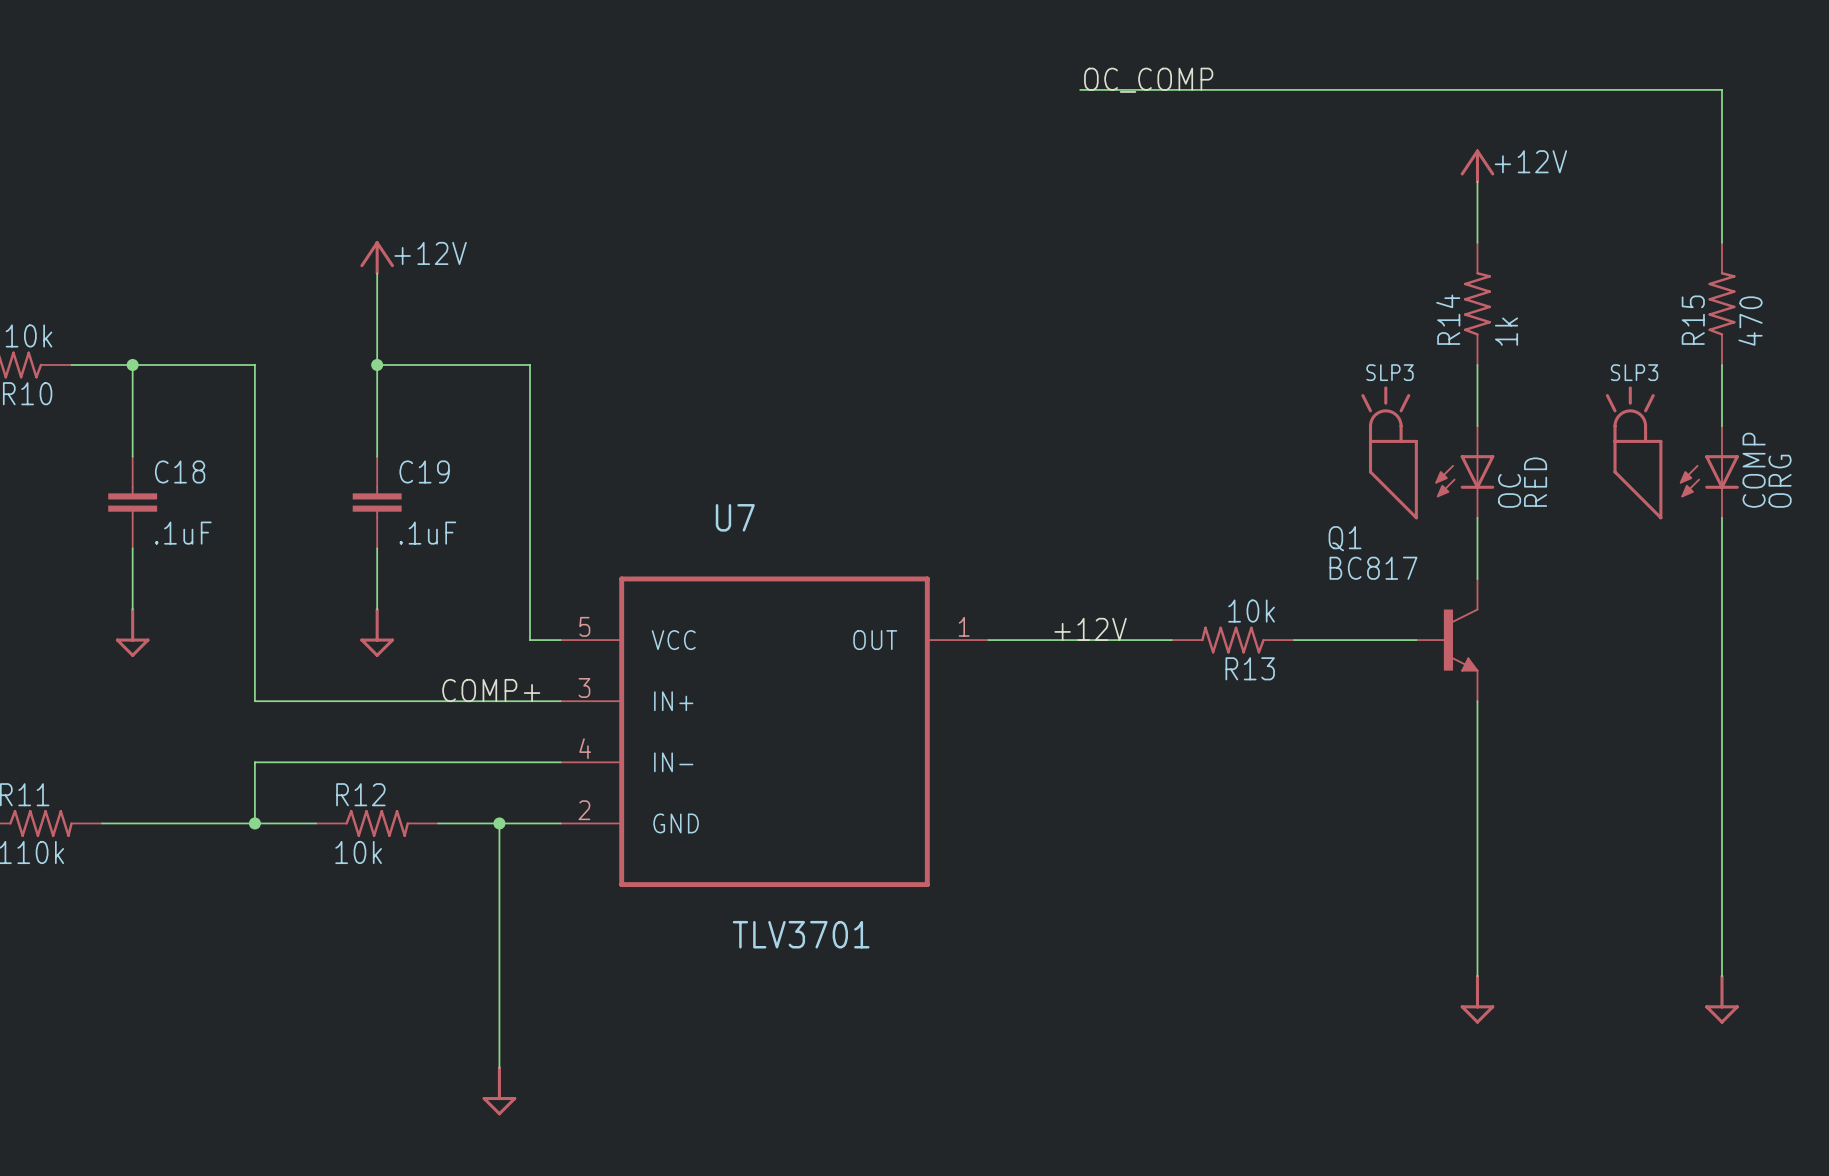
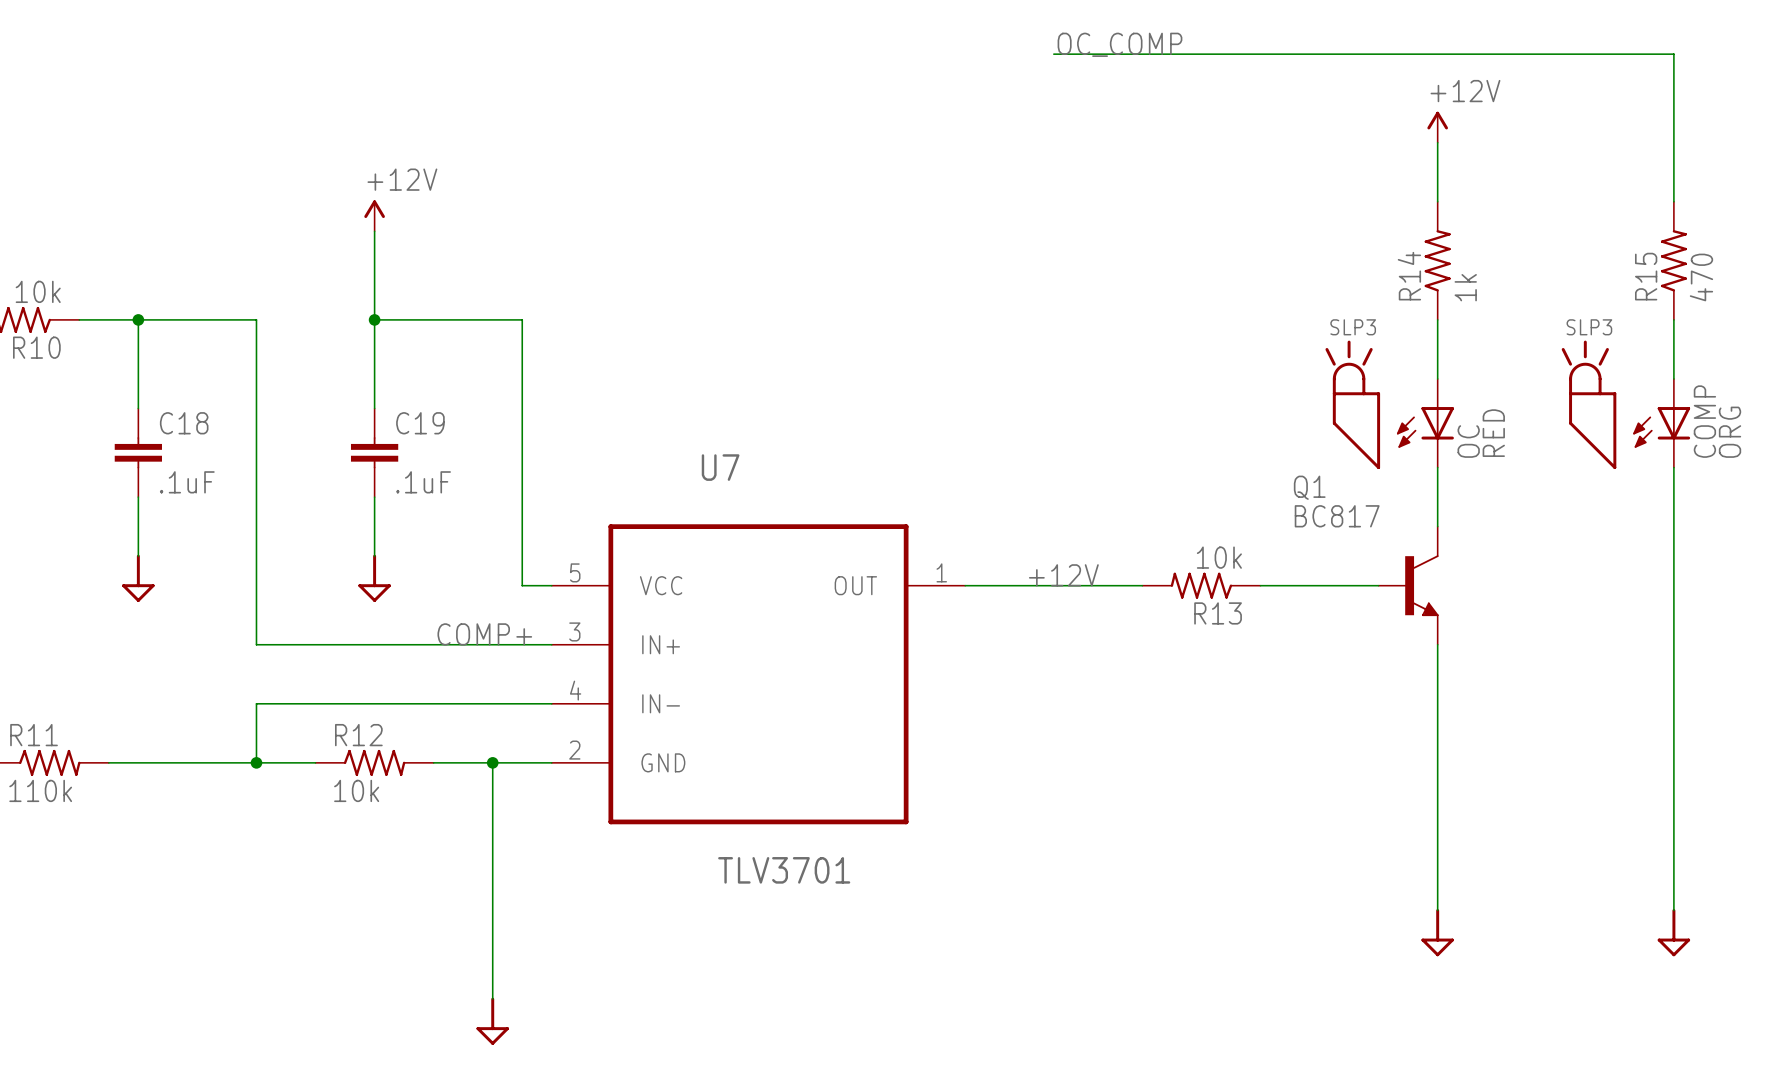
power symbol: none -> +12V (1437, 127)
part: +12V (1477, 166) -> none
power symbol: none -> +12V (374, 215)
part: +12V (377, 258) -> none

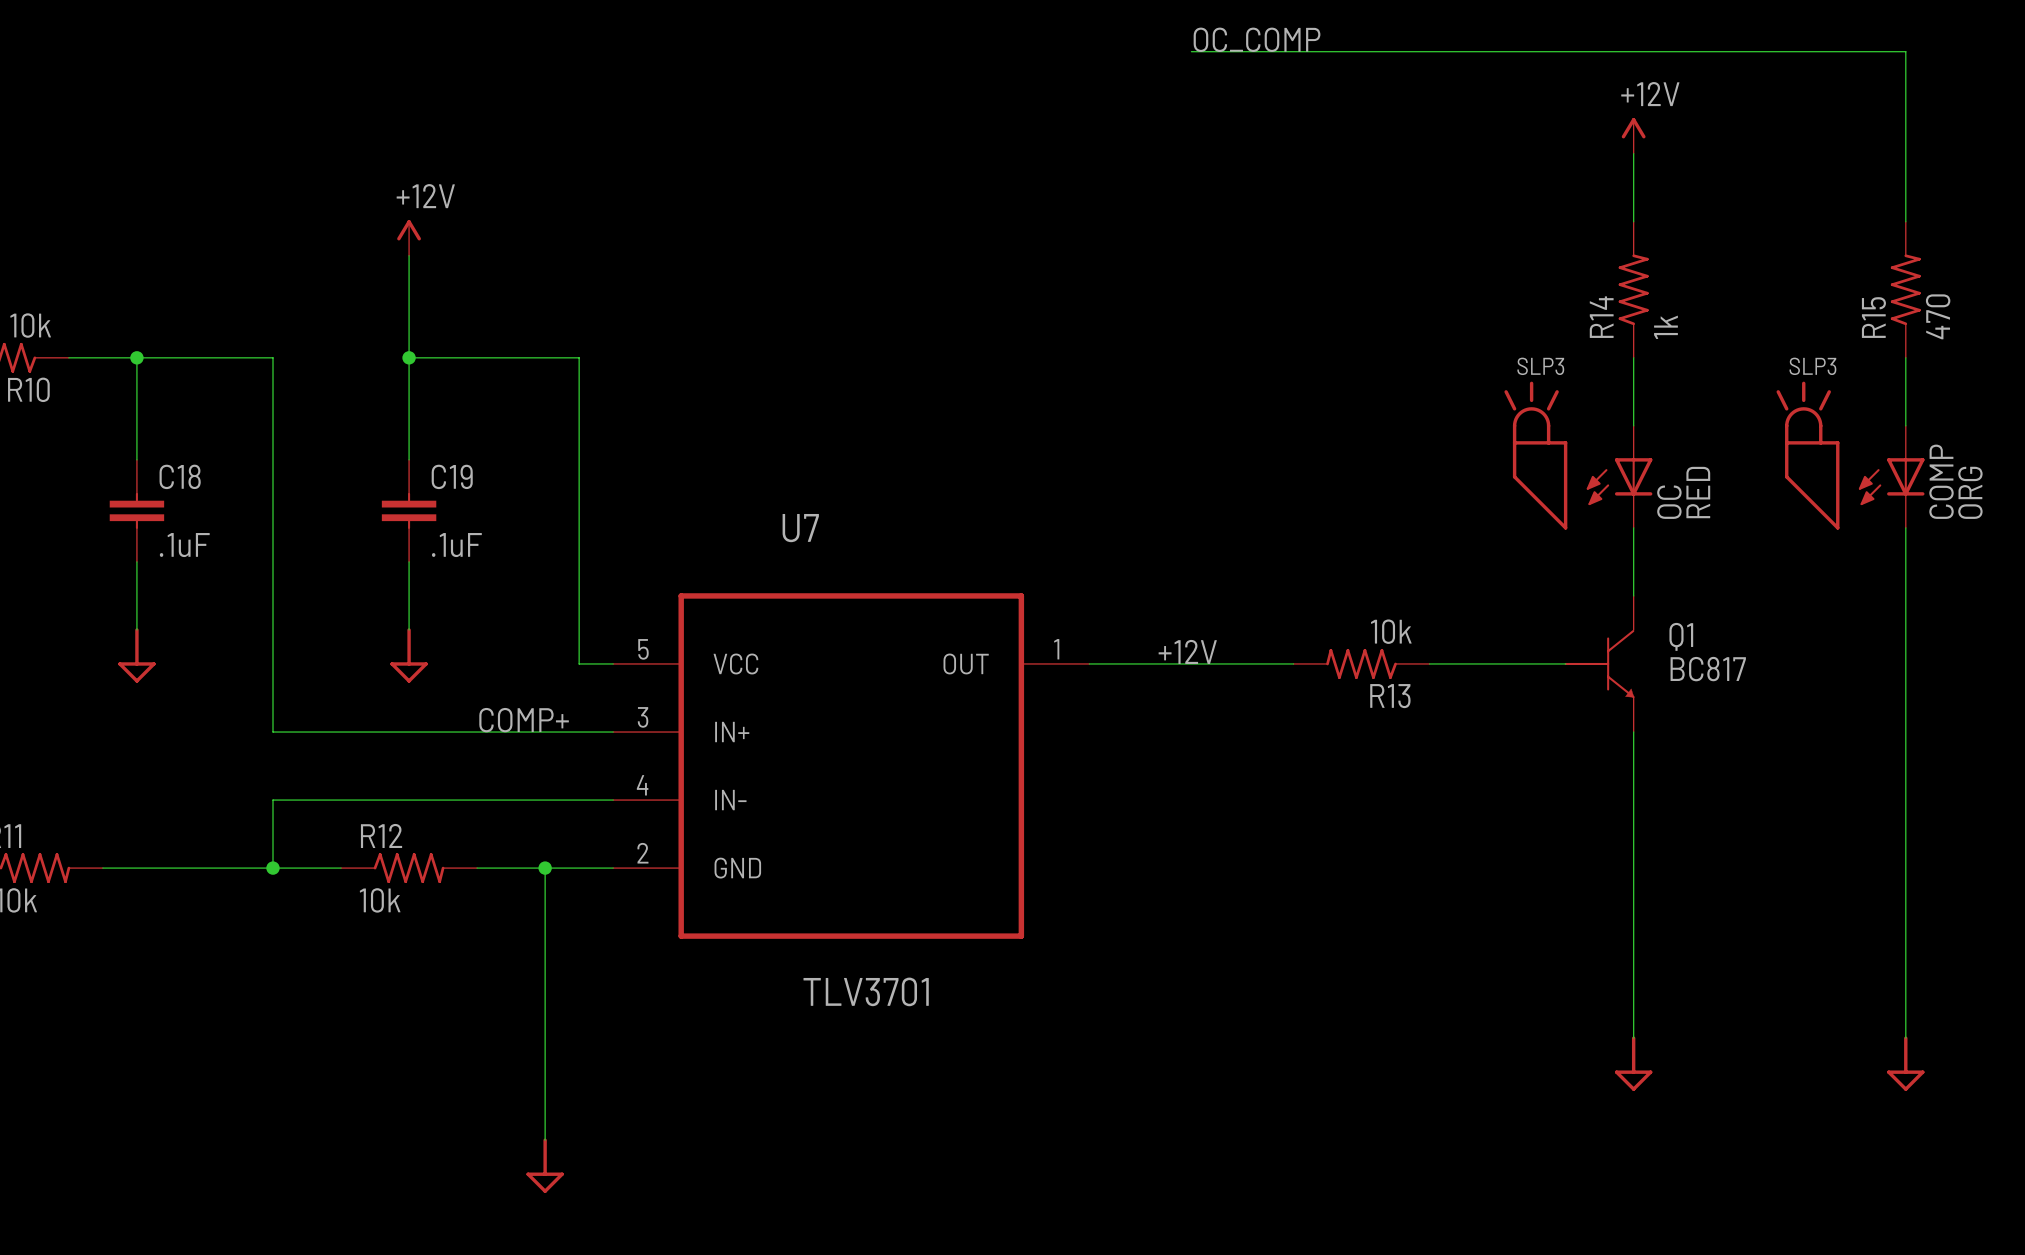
Q1 name position: Q1 (1309, 487) -> Q1 (1681, 636)
Q1 value position: BC817 (1337, 516) -> BC817 (1708, 669)
Q1 symbol: [1378, 526, 1439, 645] -> [1564, 595, 1635, 733]

